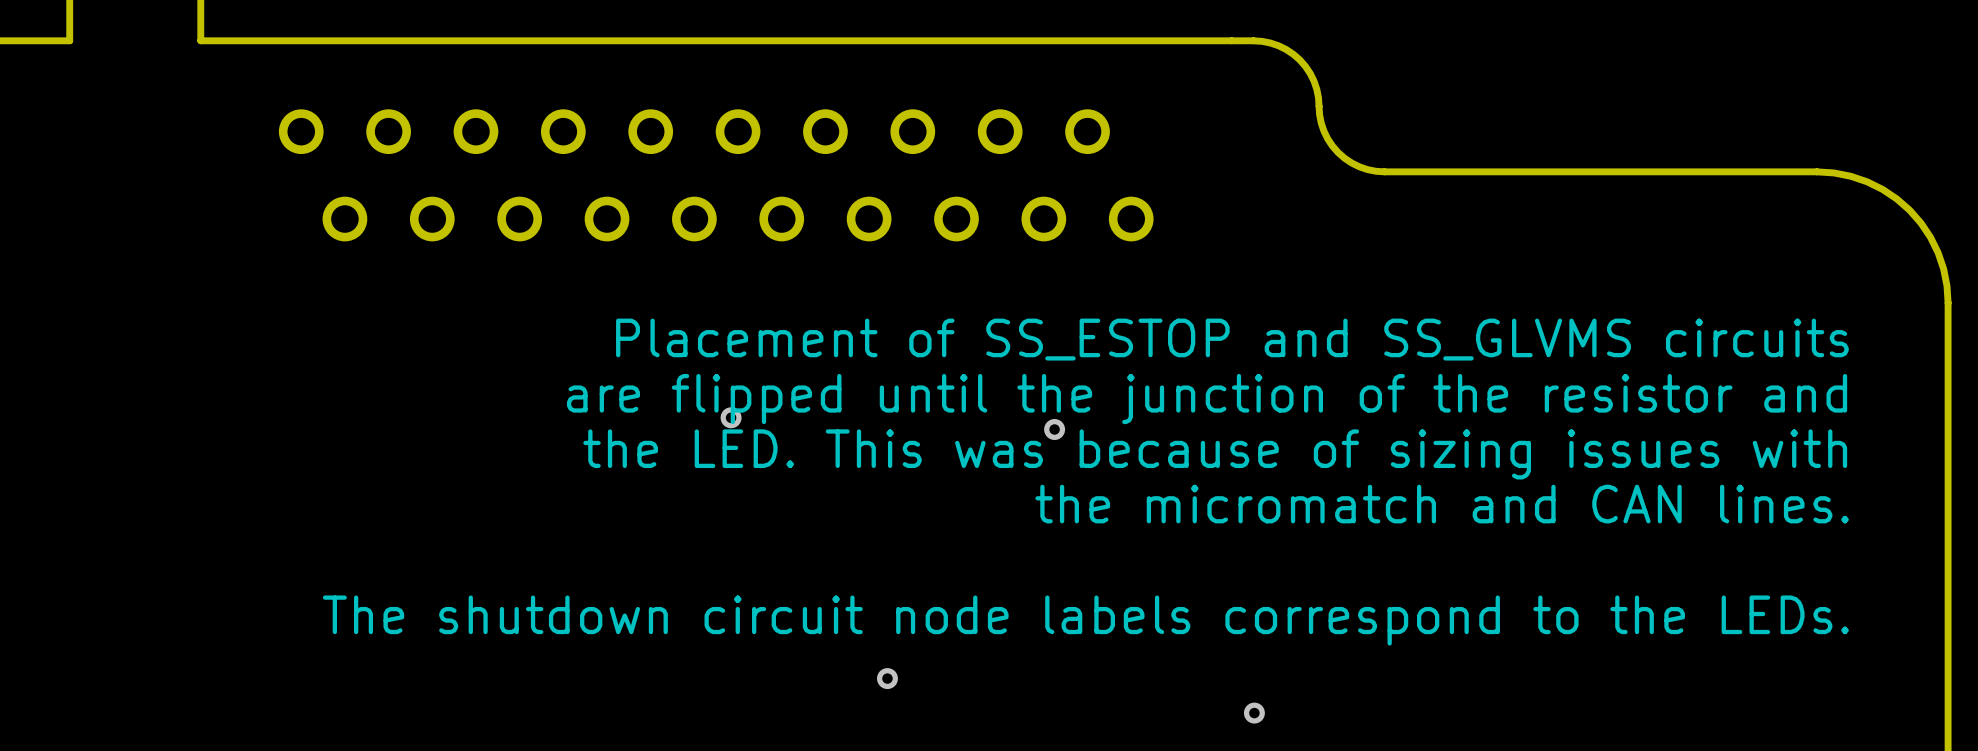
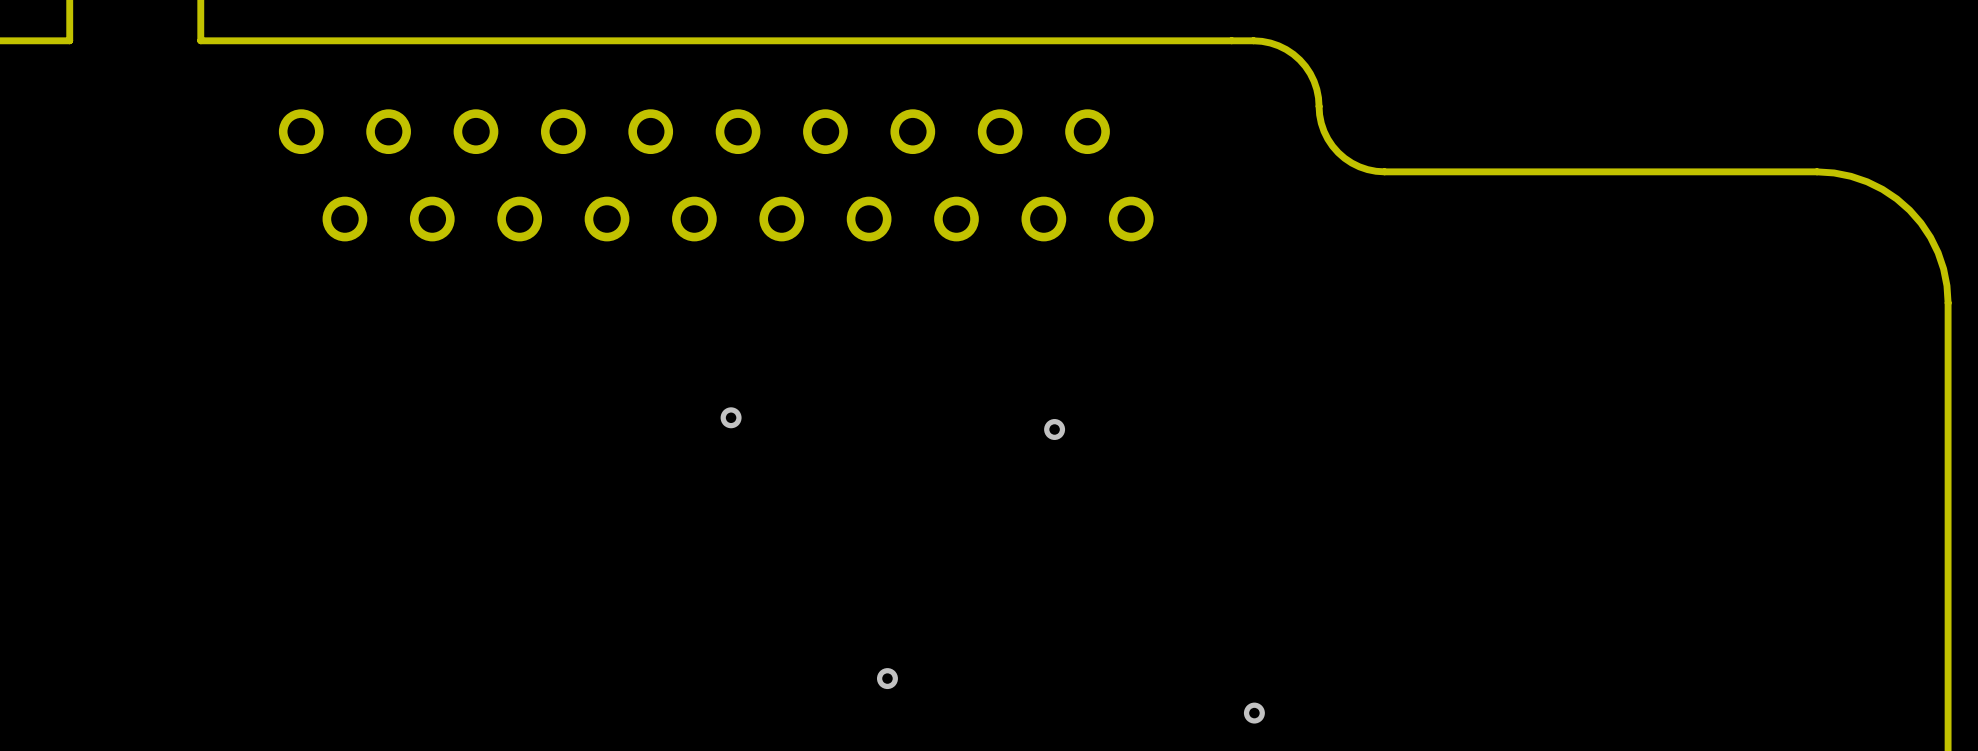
text: Placement of SS_ESTOP and SS_GLVMS circuits (1232, 339) -> none
text: are flipped until the junction of the resistor and (1207, 399) -> none
text: the LED. This was because of sizing issues with (1215, 454) -> none
text: the micromatch and CAN lines. (1442, 504) -> none
text: The shutdown circuit node labels correspond to the LEDs. (1085, 620) -> none

